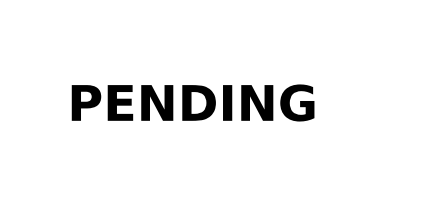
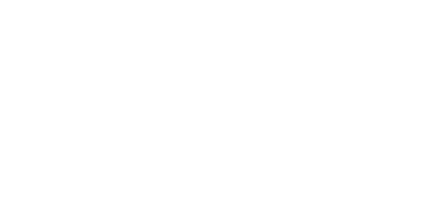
text: PENDING (193, 102) -> none

